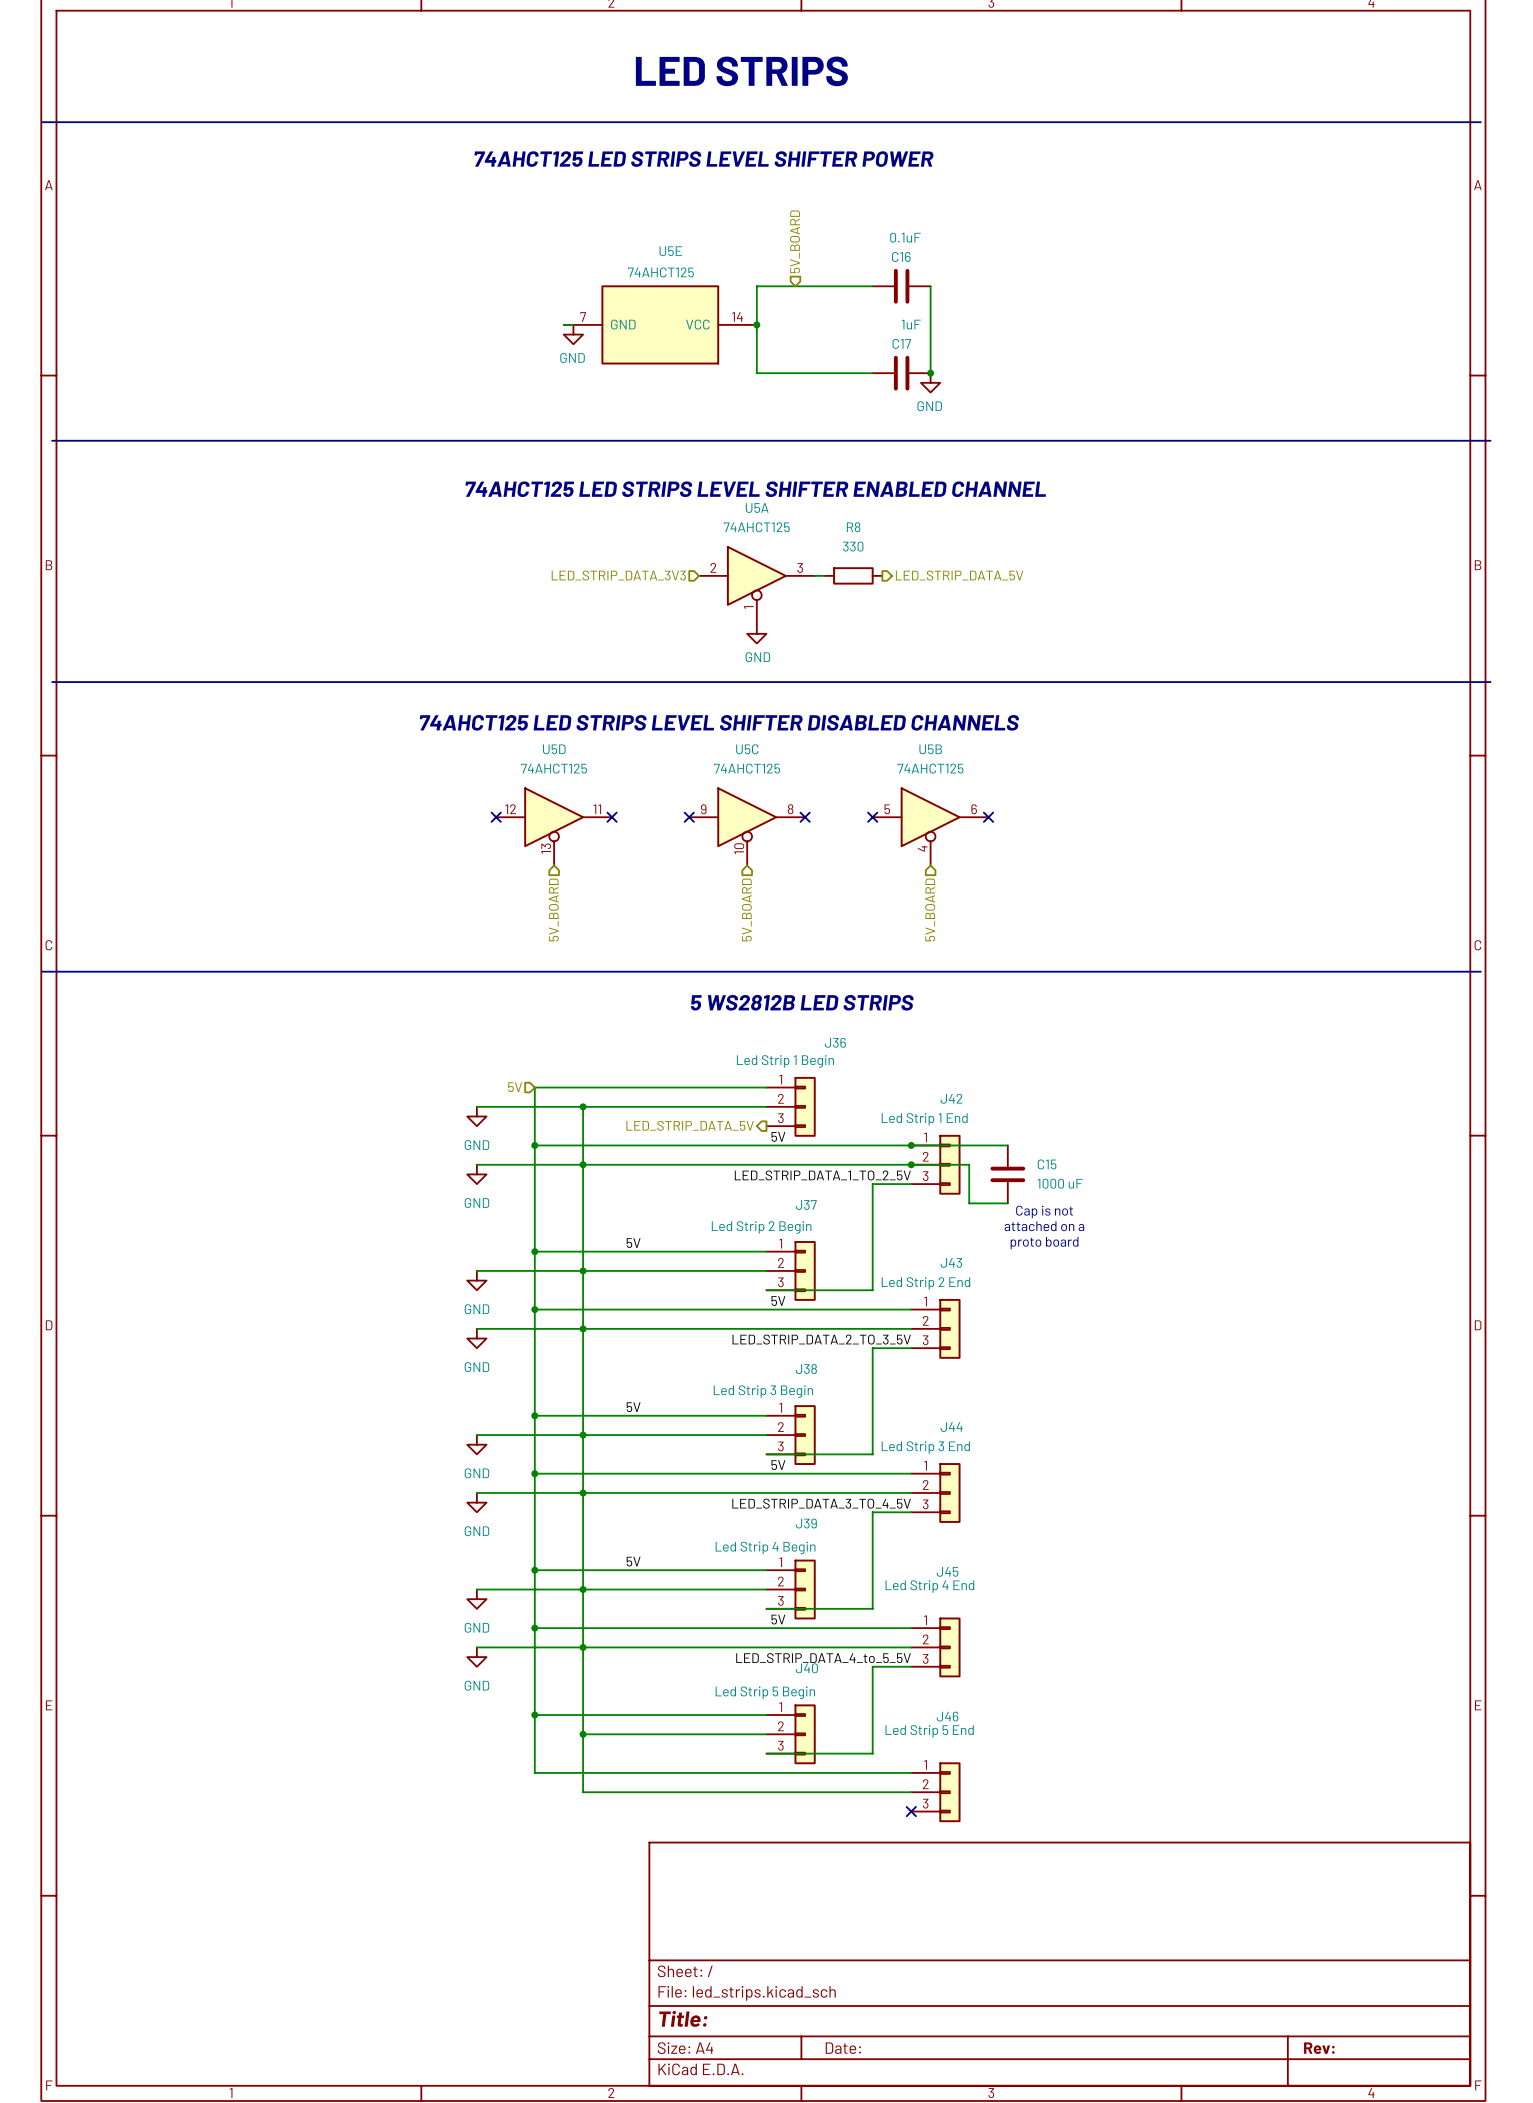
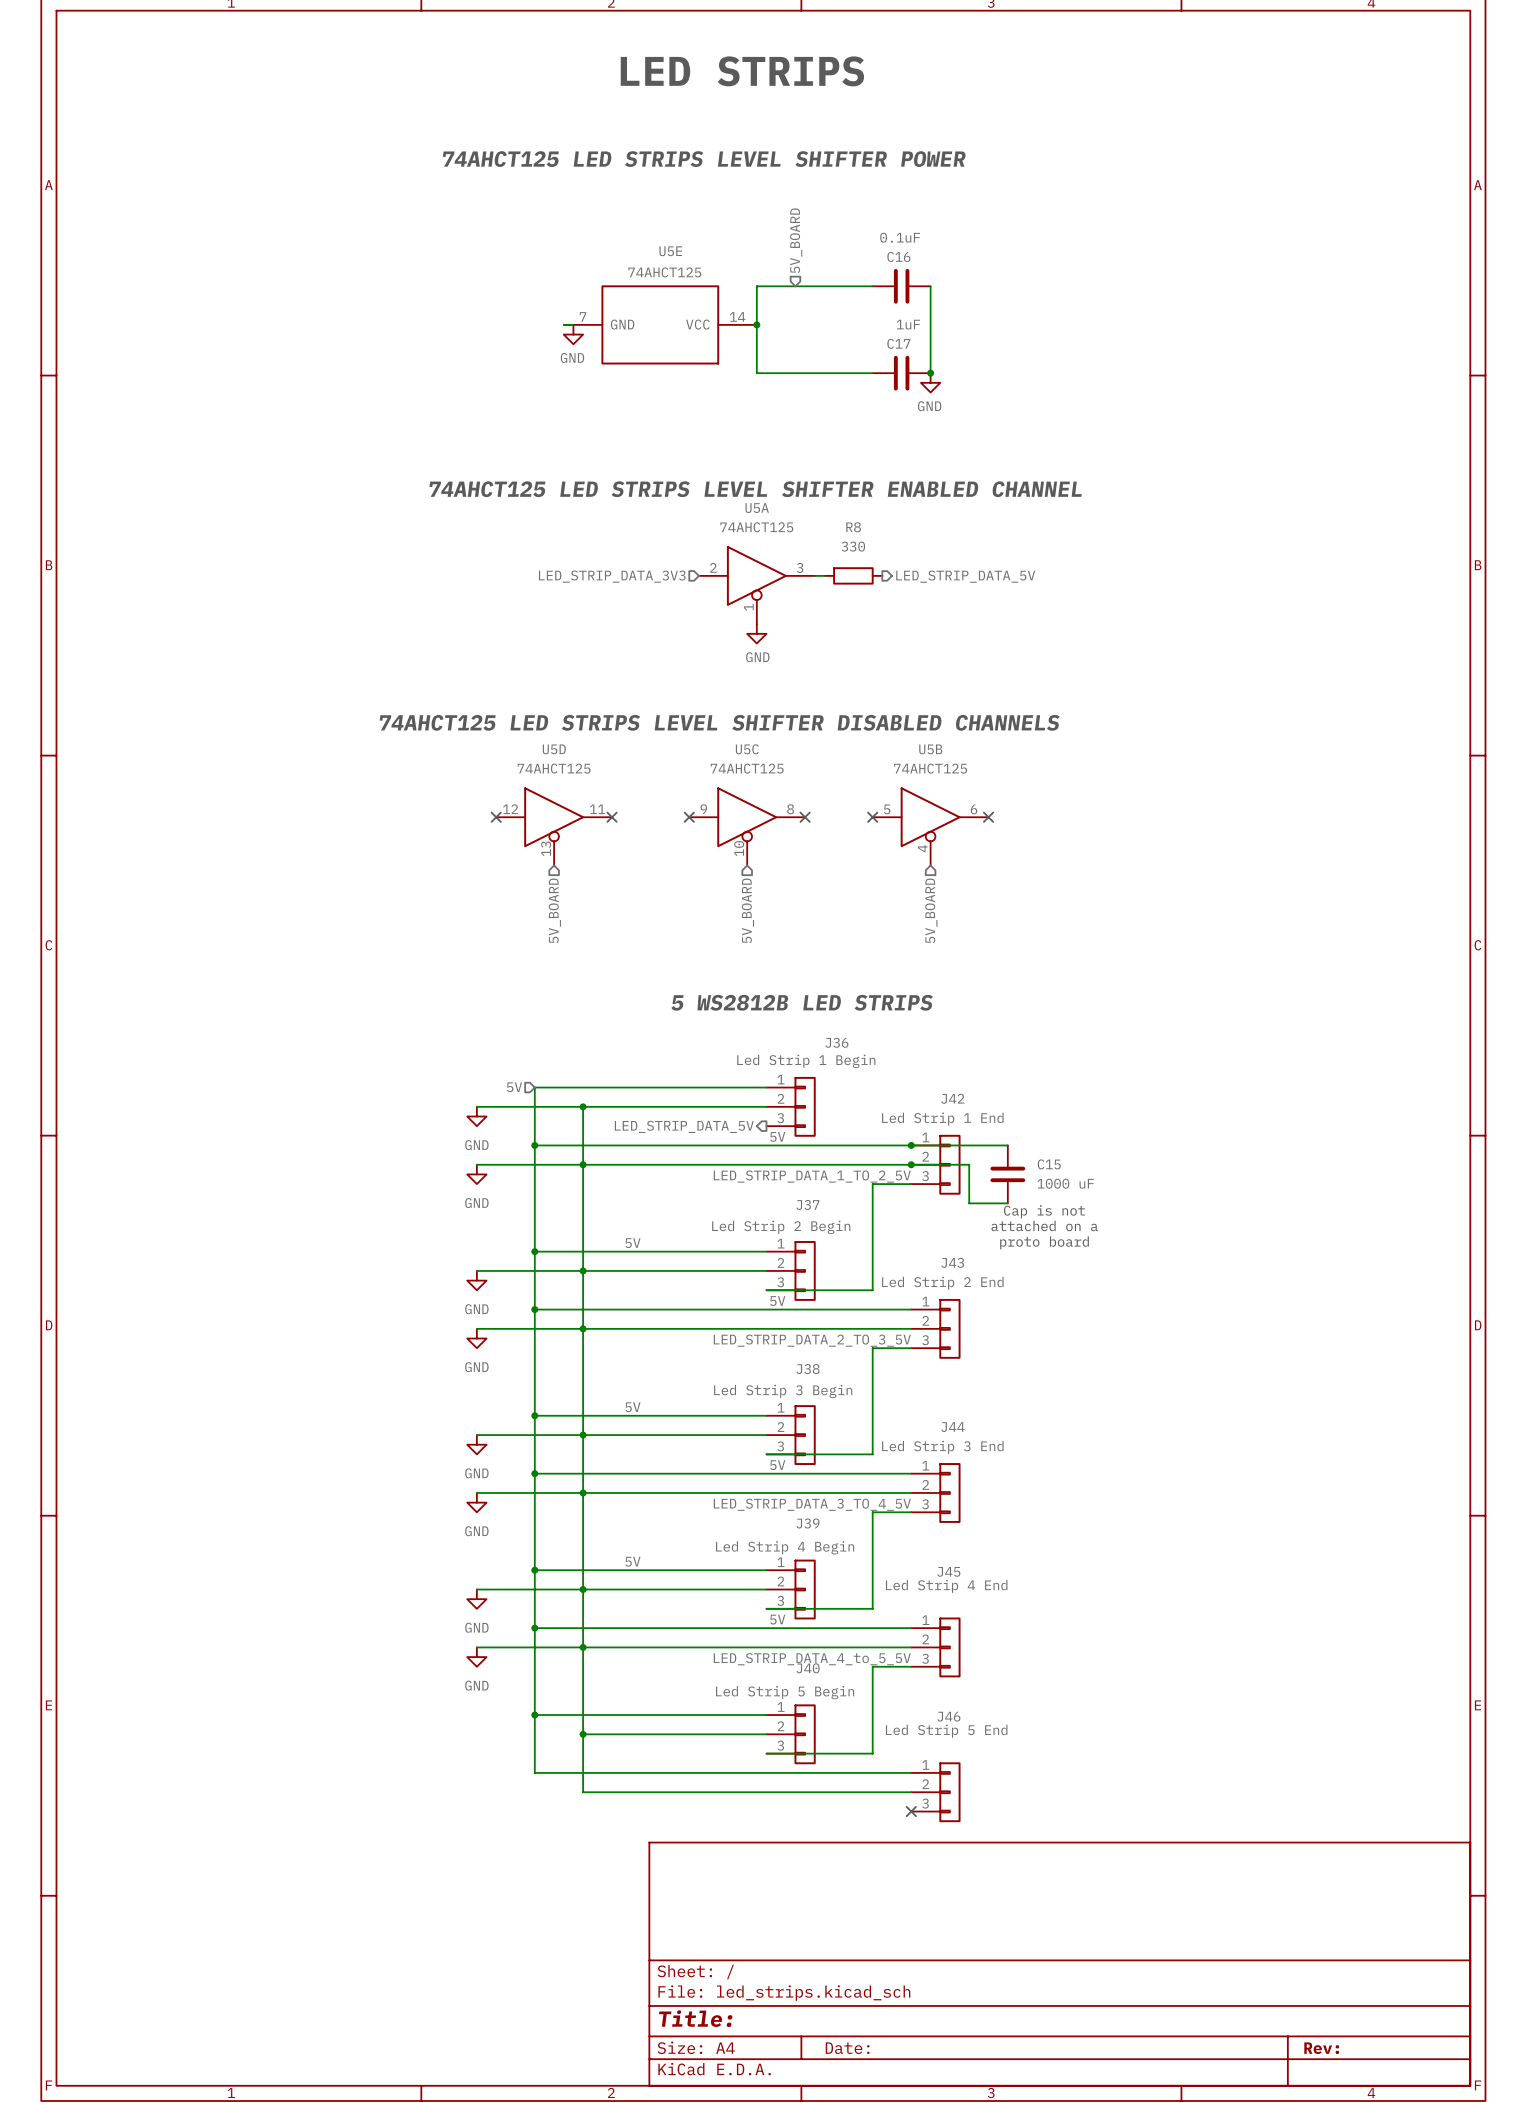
line: (42, 122) (1480, 122) -> none
line: (52, 440) (1490, 440) -> none
line: (52, 682) (1490, 682) -> none
line: (42, 971) (1480, 971) -> none

